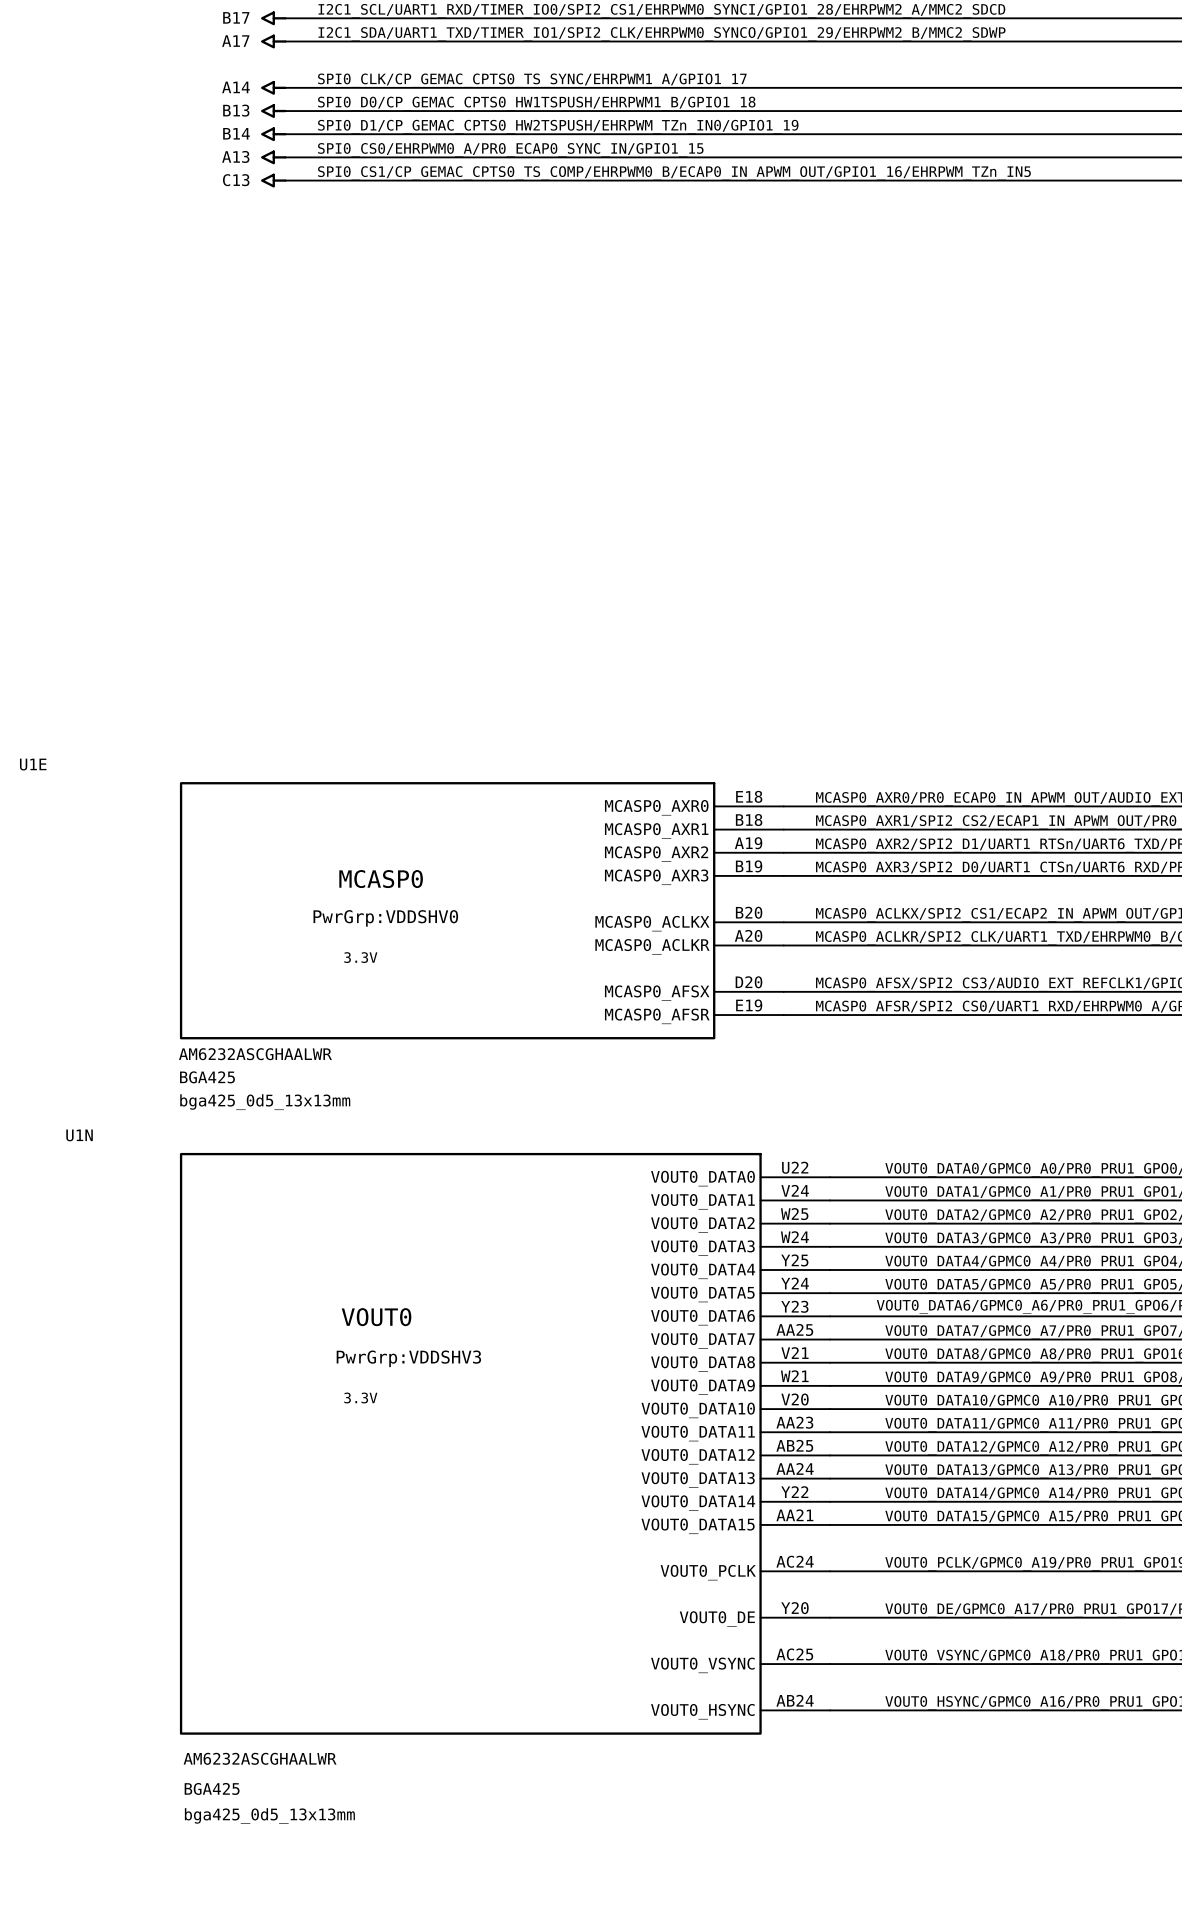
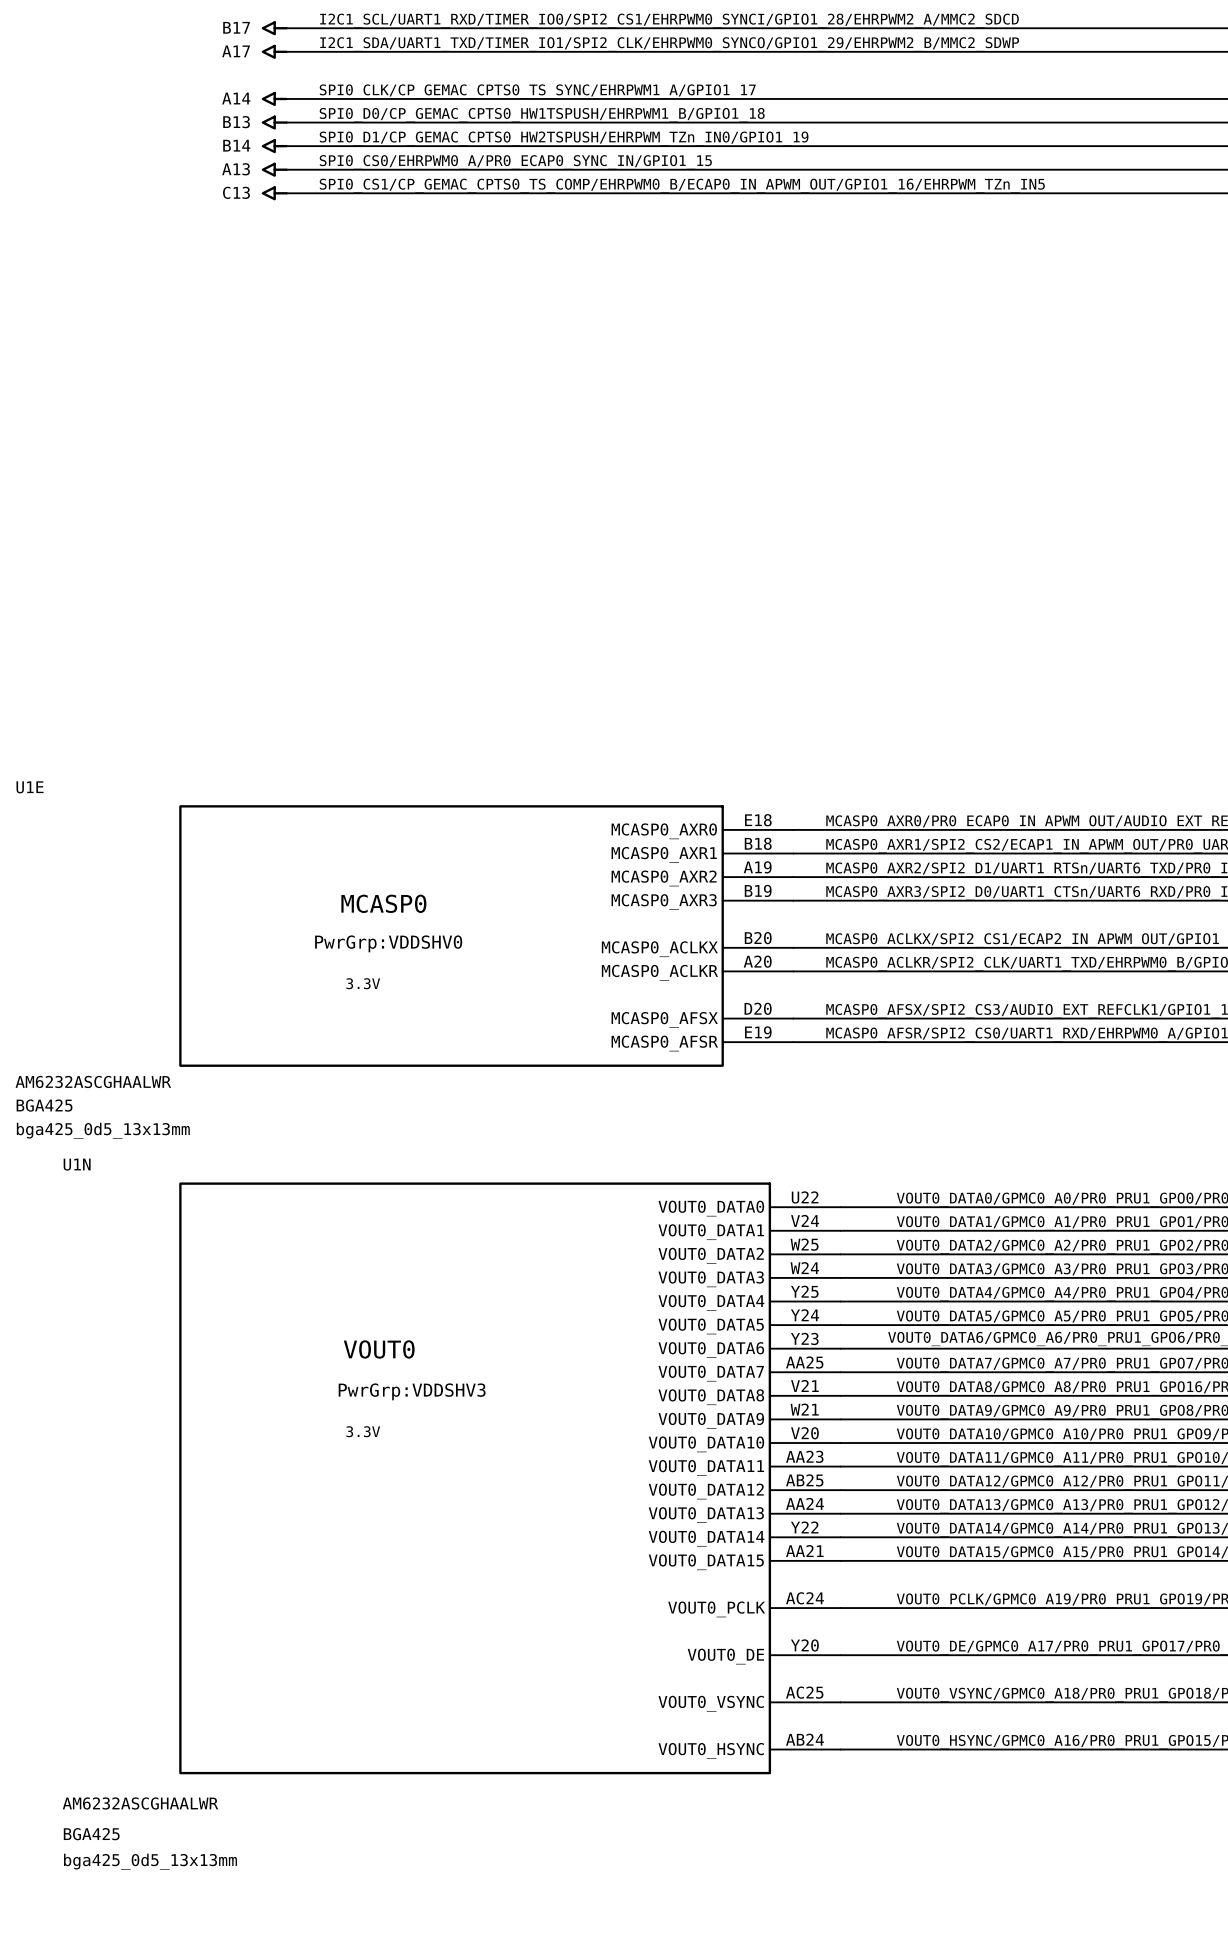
U1E value position: AM6232ASCGHAALWR (255, 1054) -> AM6232ASCGHAALWR (93, 1081)
U1E text position: BGA425 (207, 1077) -> BGA425 (44, 1105)
U1E text position: bga425_0d5_13x13mm (265, 1102) -> bga425_0d5_13x13mm (103, 1130)
U1N value position: AM6232ASCGHAALWR (260, 1758) -> AM6232ASCGHAALWR (140, 1803)
U1N text position: BGA425 (212, 1788) -> BGA425 (91, 1834)
U1N text position: bga425_0d5_13x13mm (269, 1816) -> bga425_0d5_13x13mm (150, 1861)

